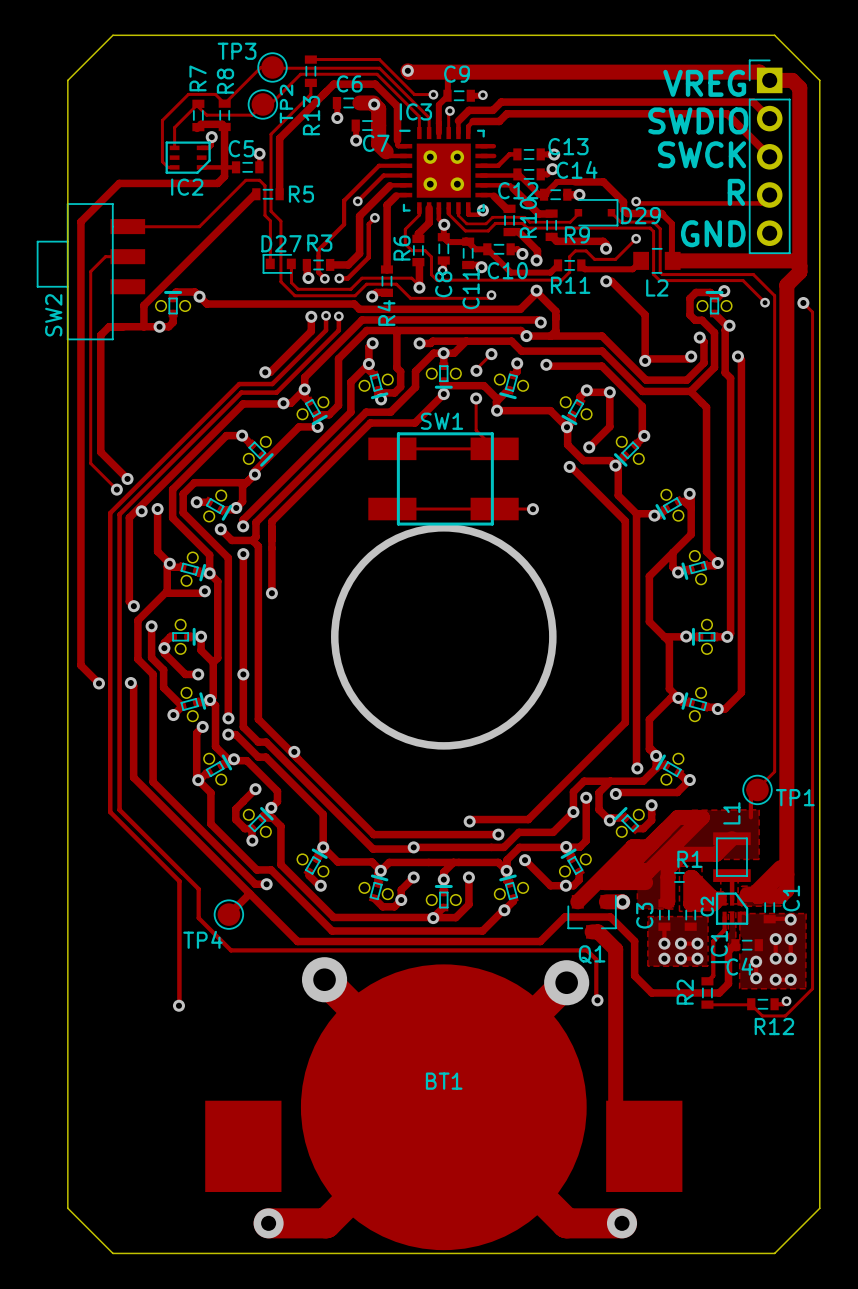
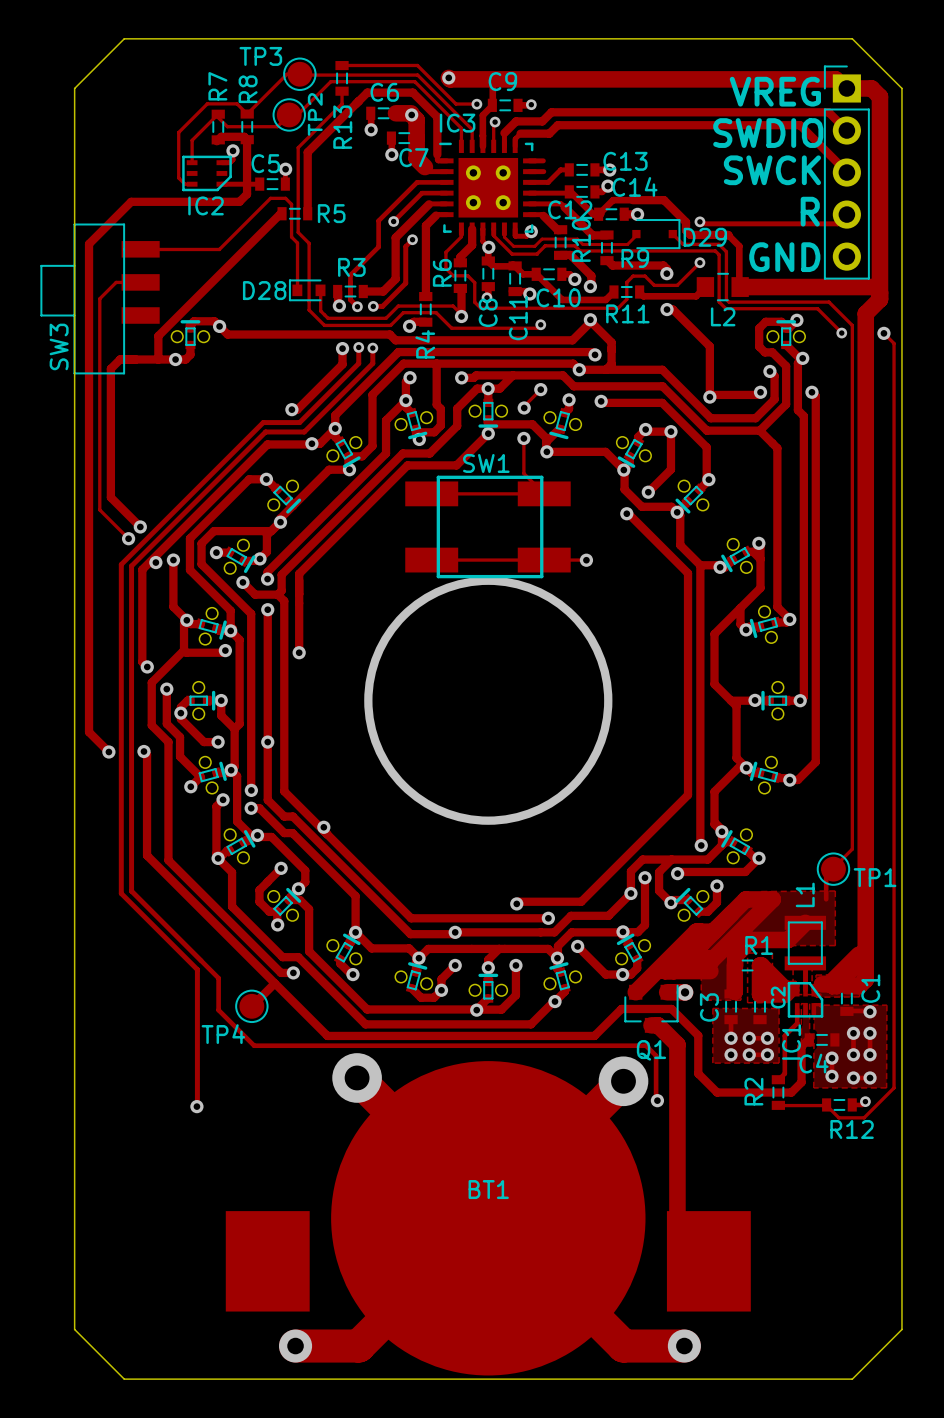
D27 name: D27 (281, 243) -> D28 (264, 290)
SW2 name: SW2 (53, 315) -> SW3 (59, 346)

